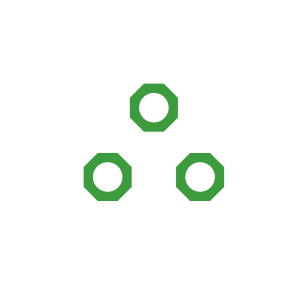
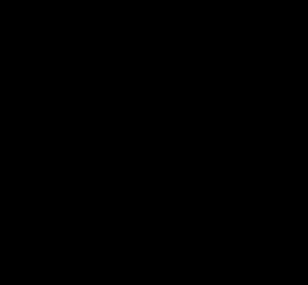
part: (153, 142) -> none

